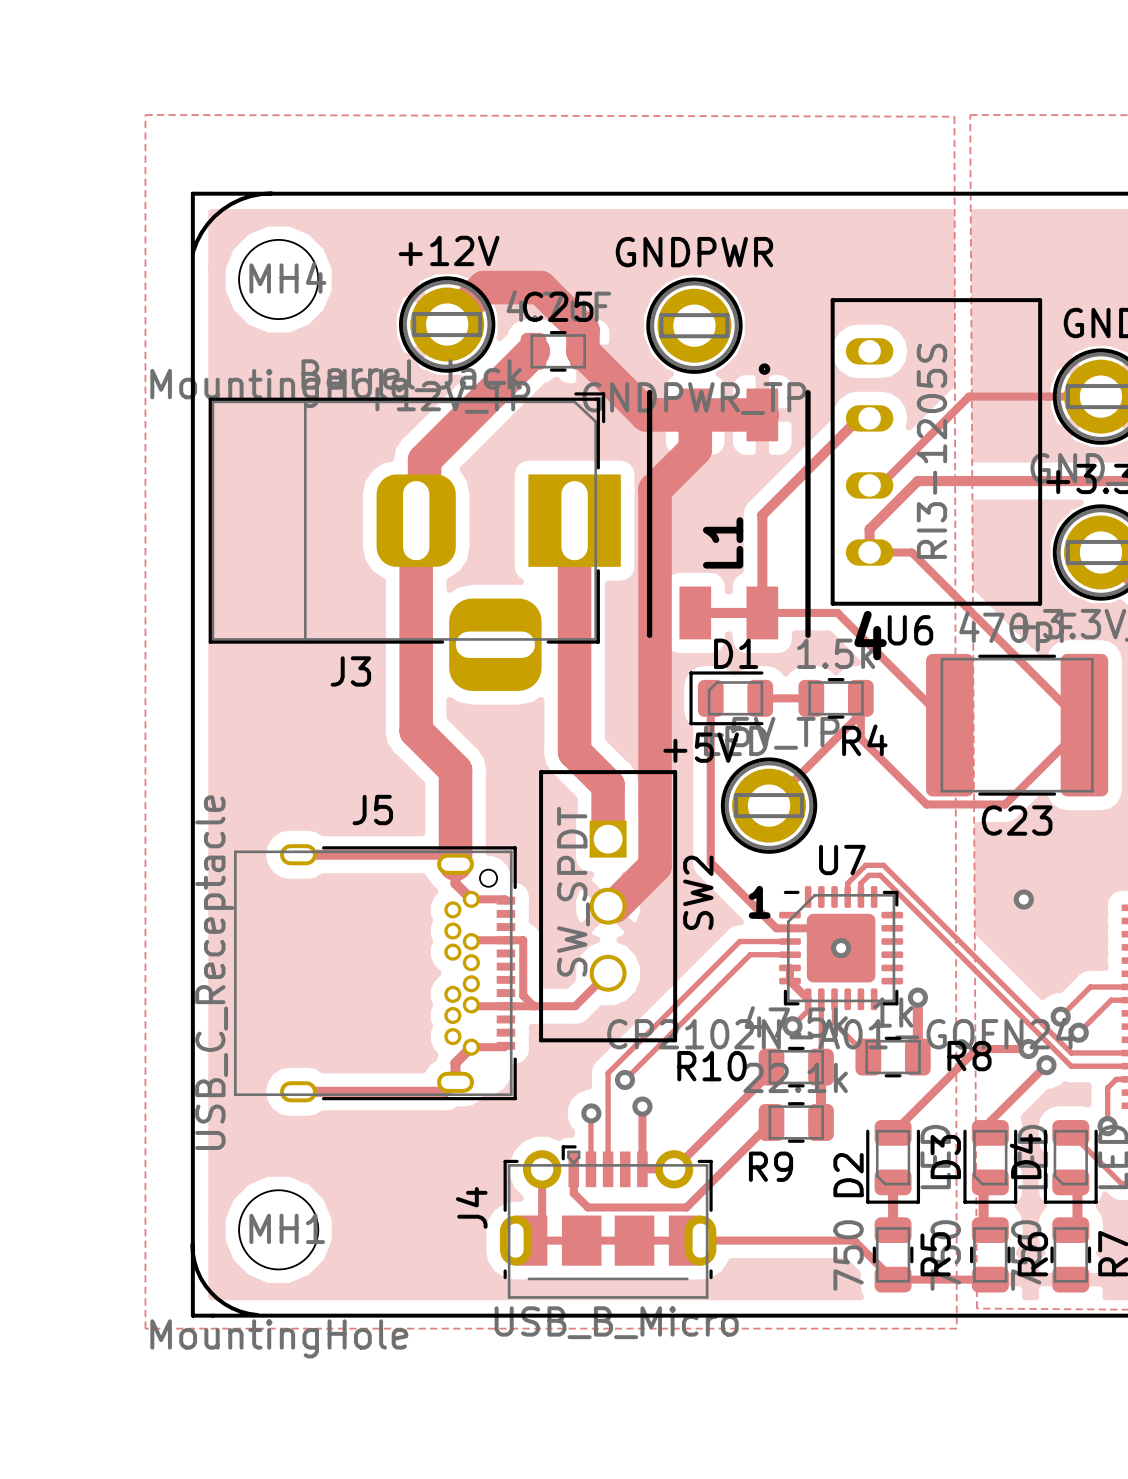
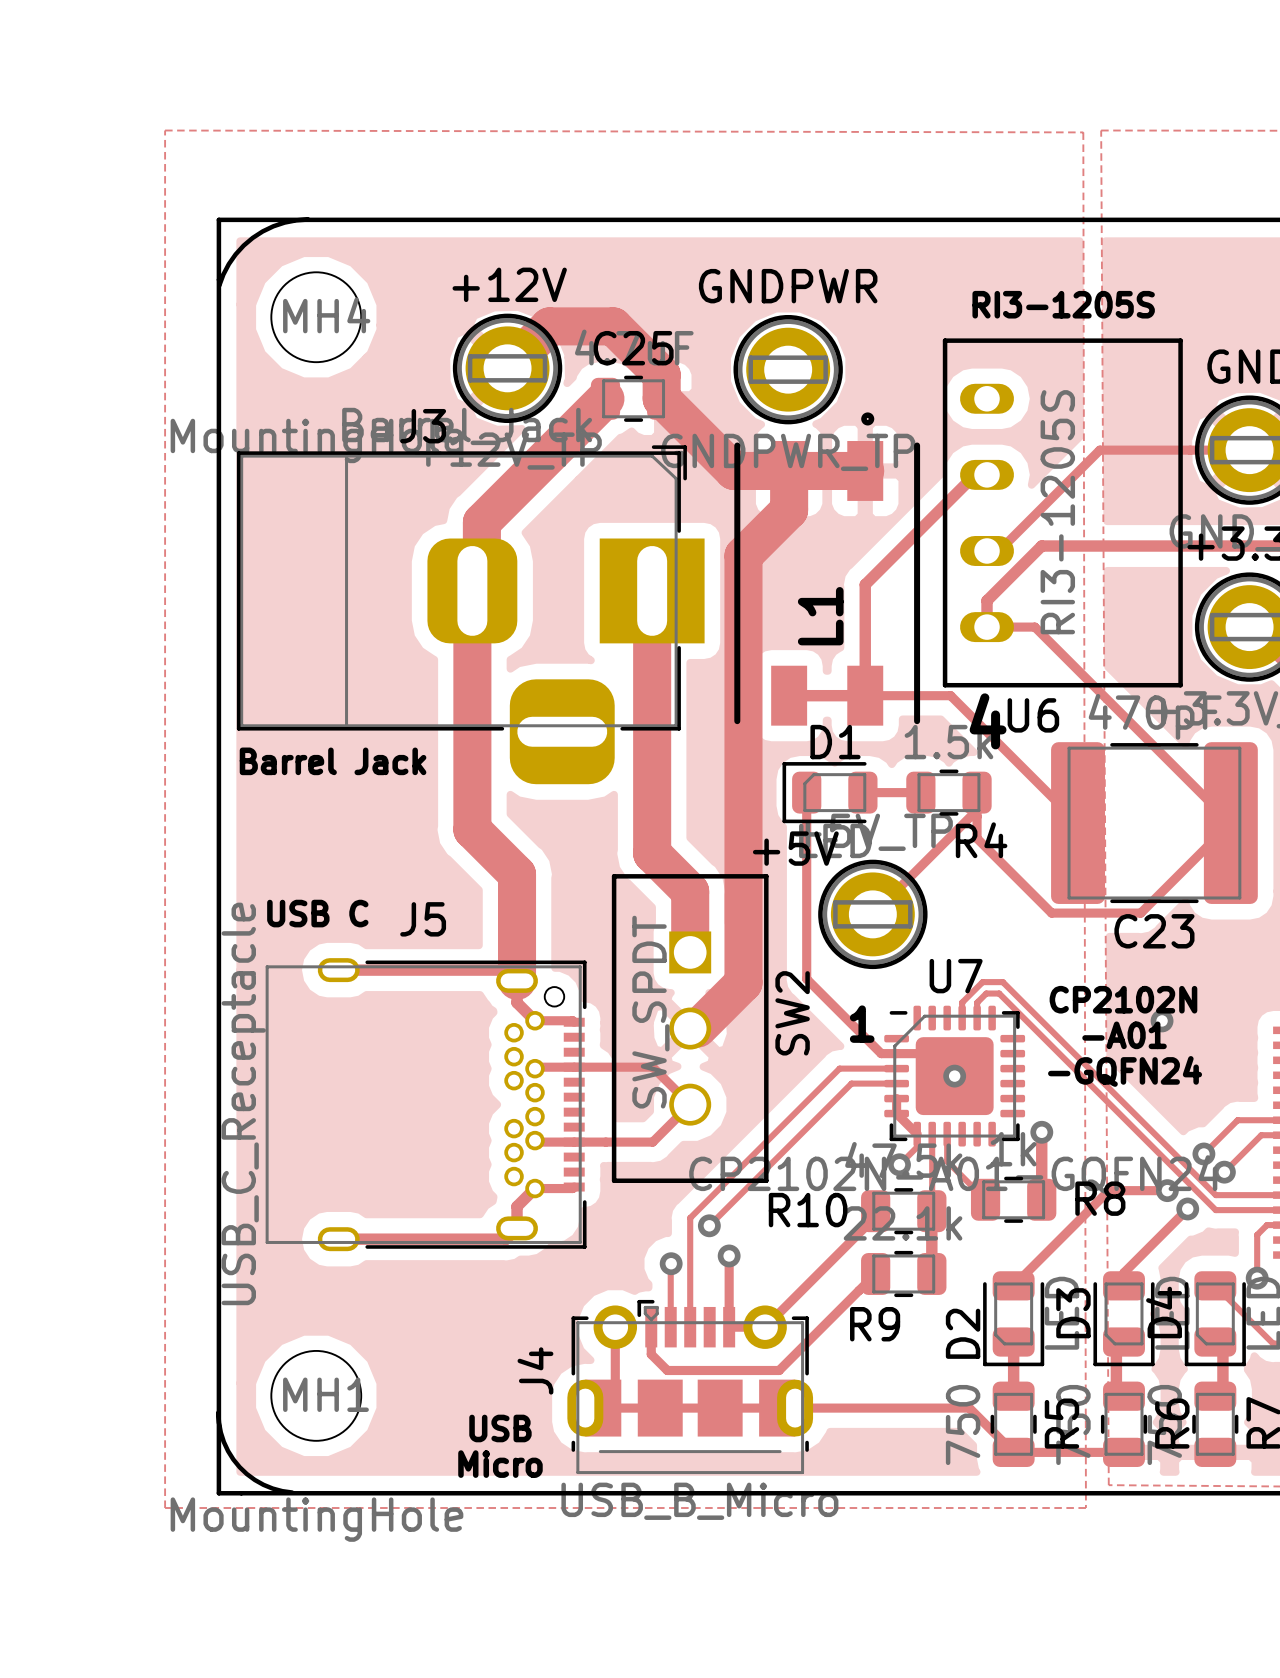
text: none -> RI3-1205S (1063, 304)
text: none -> Barrel Jack (333, 761)
J3 name position: J3 (350, 671) -> J3 (423, 426)
text: none -> USB C (317, 913)
text: none -> CP2102N (1123, 999)
text: none -> -A01 (1124, 1035)
track: (523, 940) (523, 995) (533, 1006) -> (593, 1067) (652, 1067) (690, 1104)
text: none -> -GQFN24 (1125, 1071)
text: none -> USB (500, 1428)
text: none -> Micro (500, 1464)

